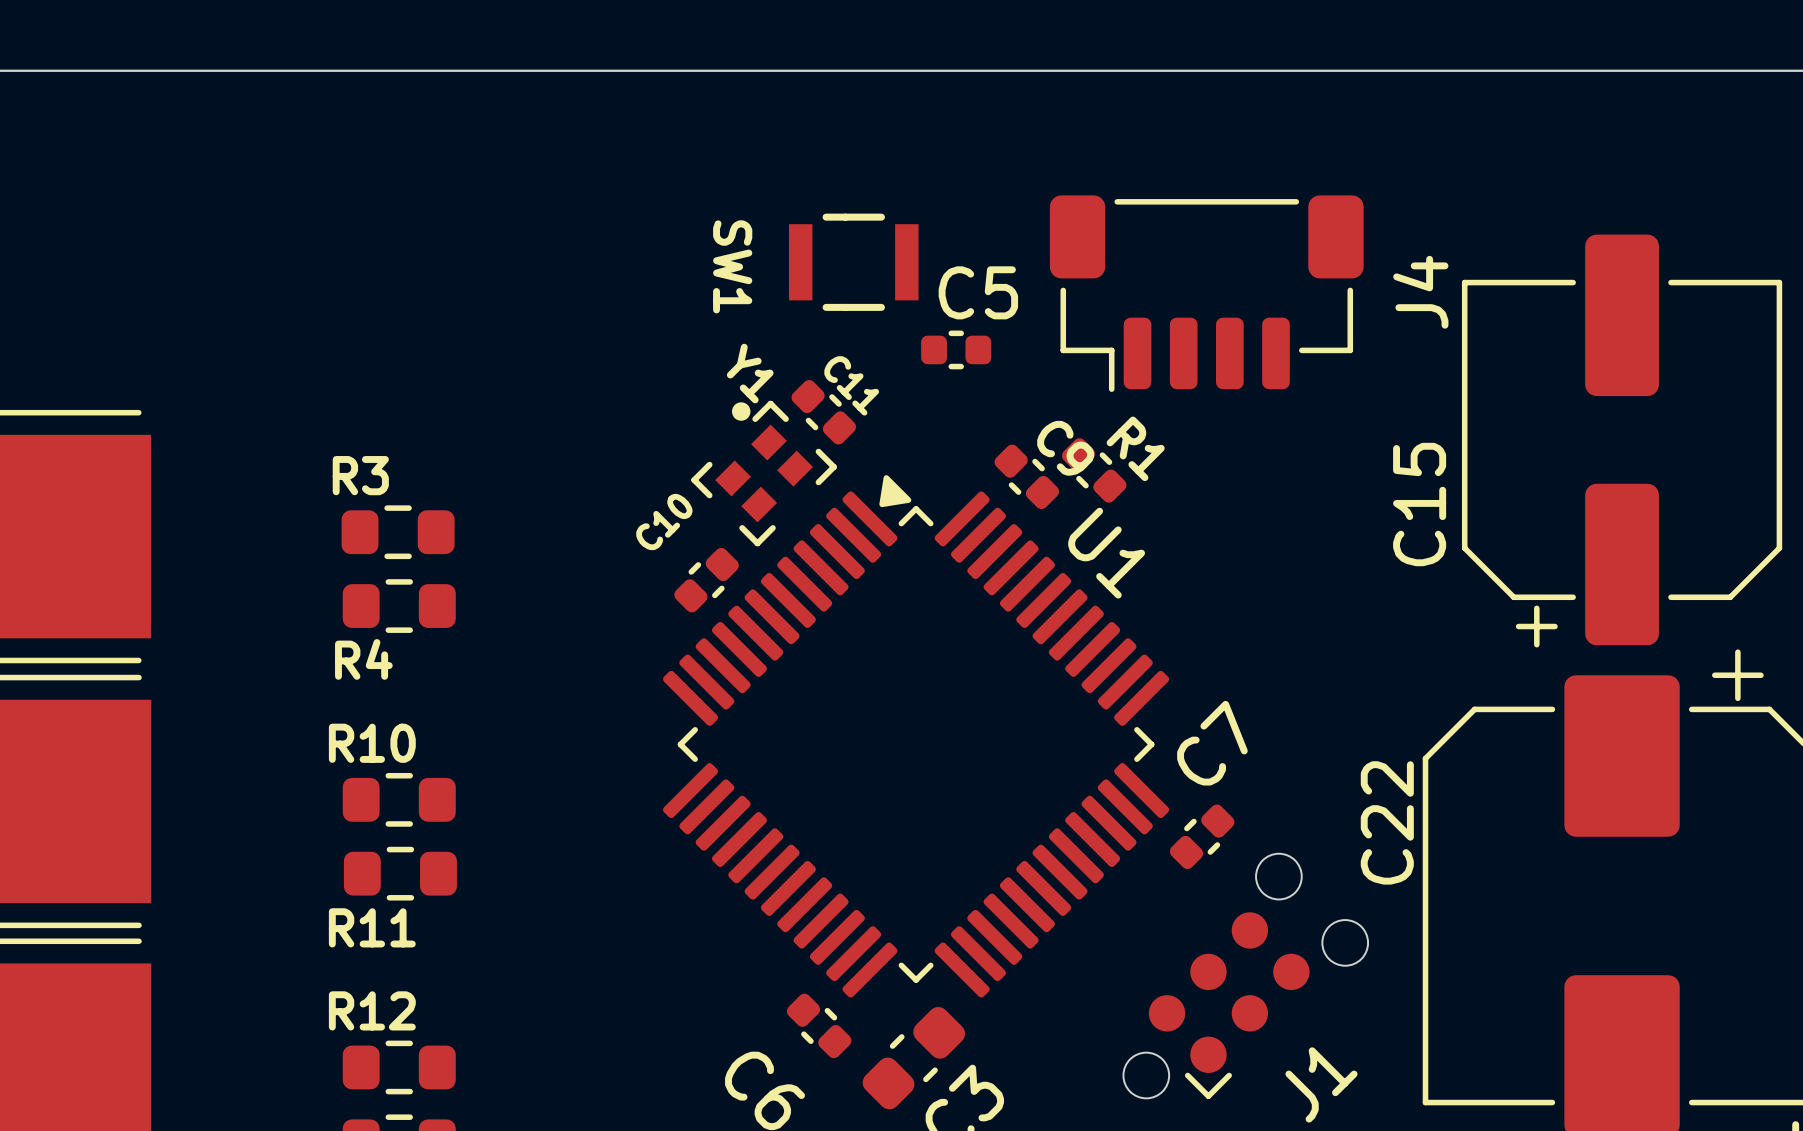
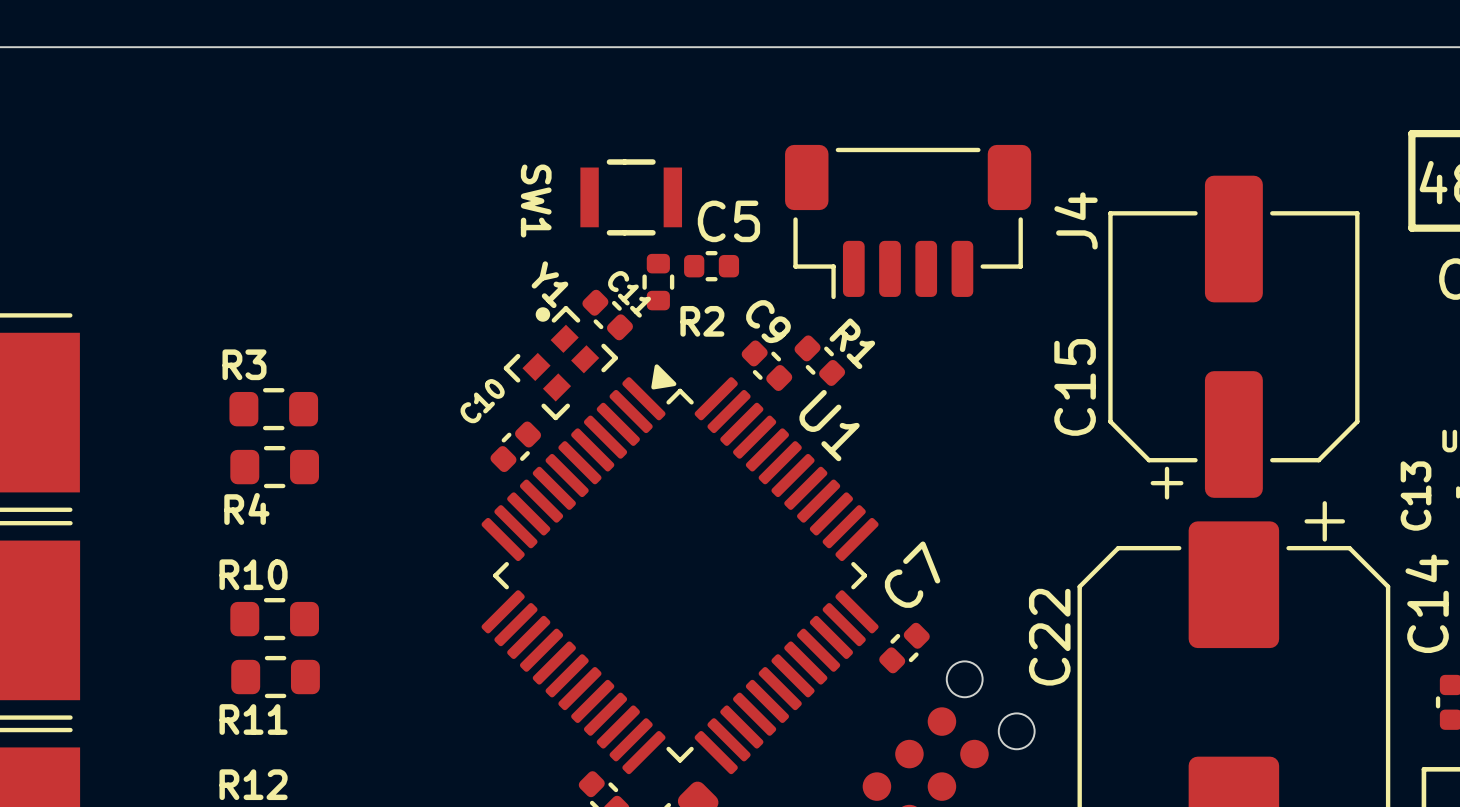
R2: none -> (658, 282)
C9 name position: C9 (1065, 448) -> C9 (768, 321)

